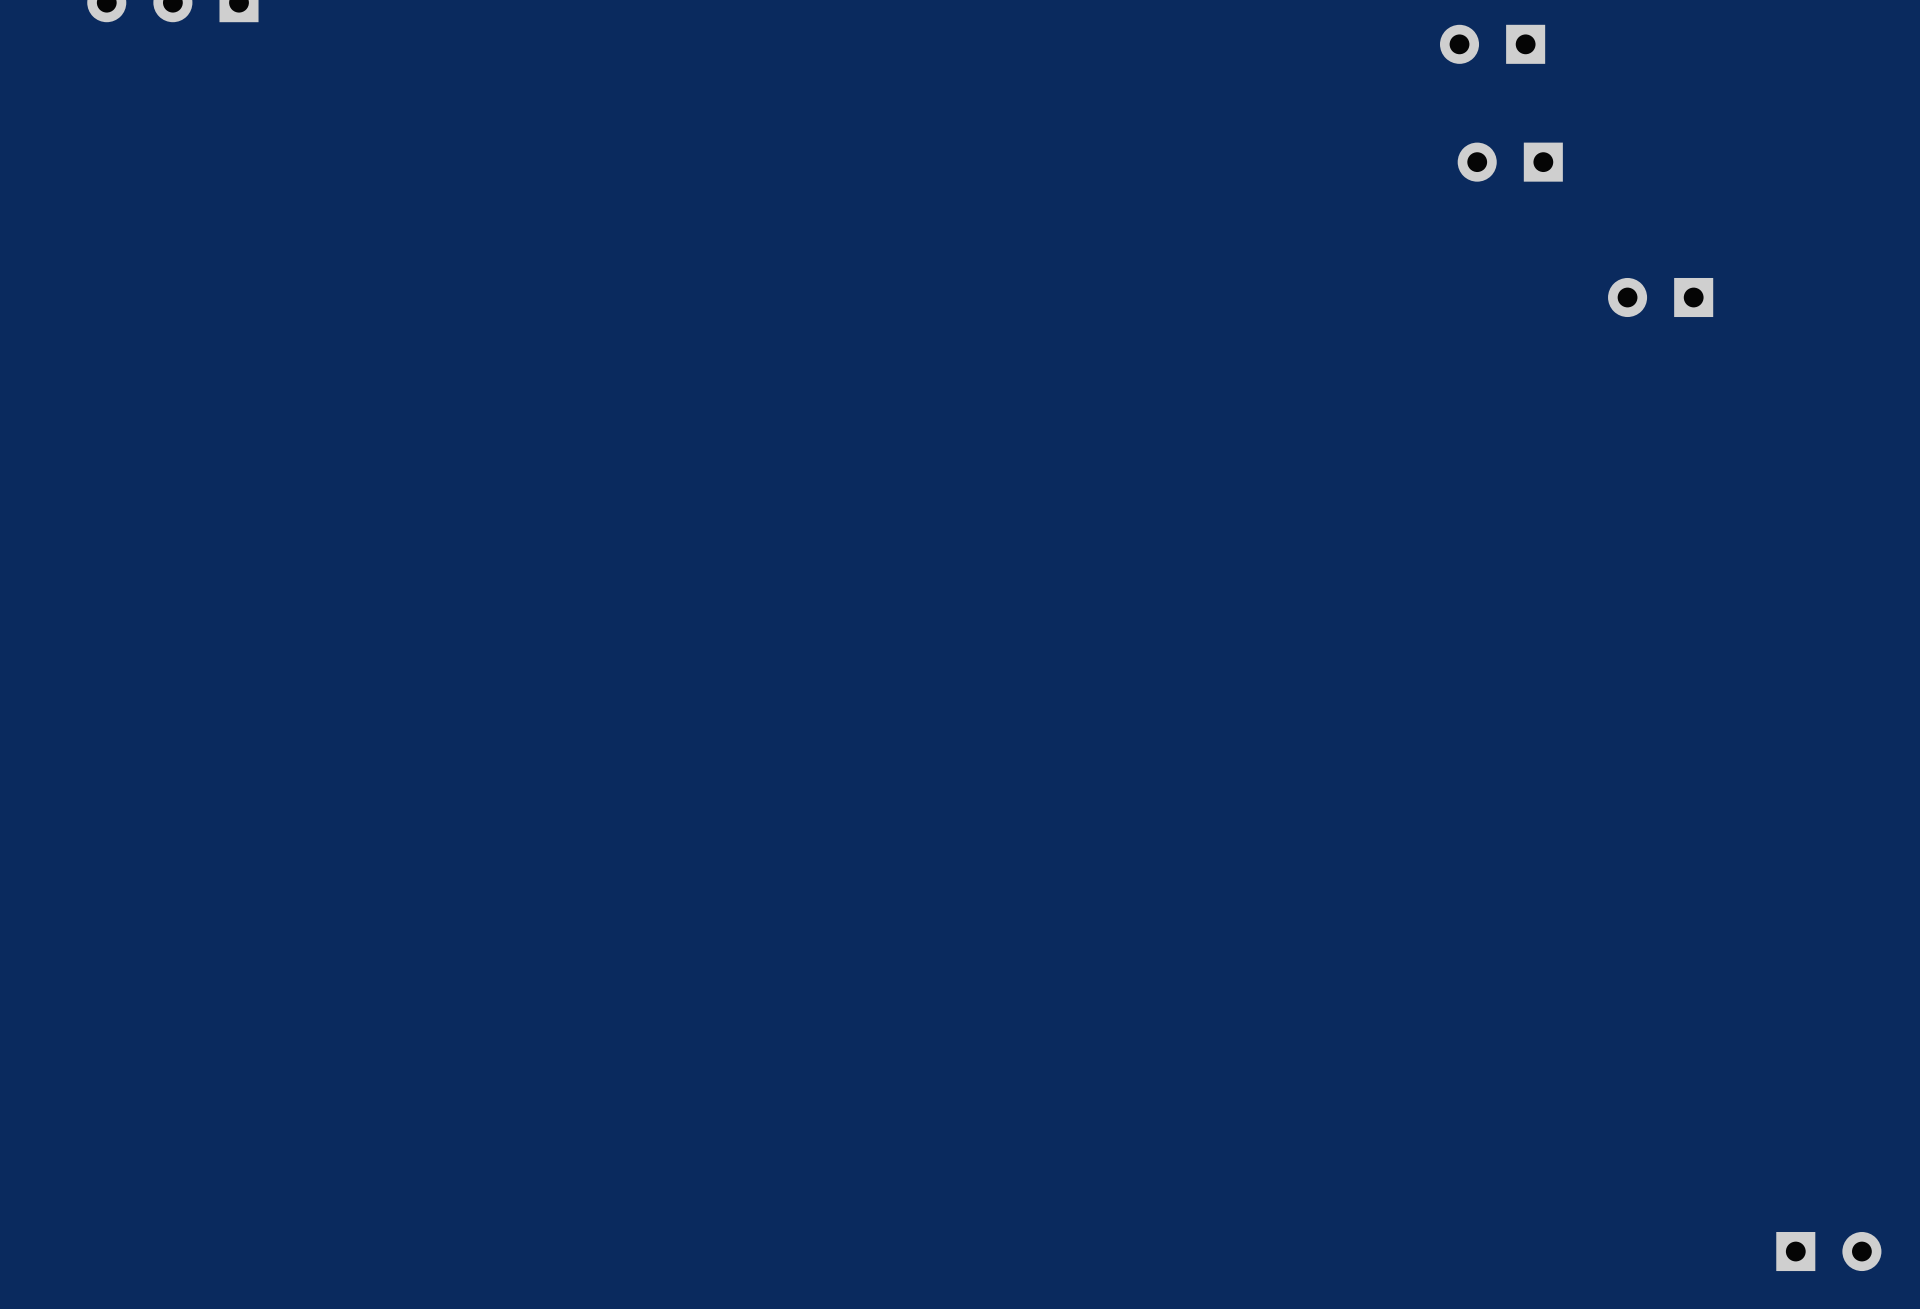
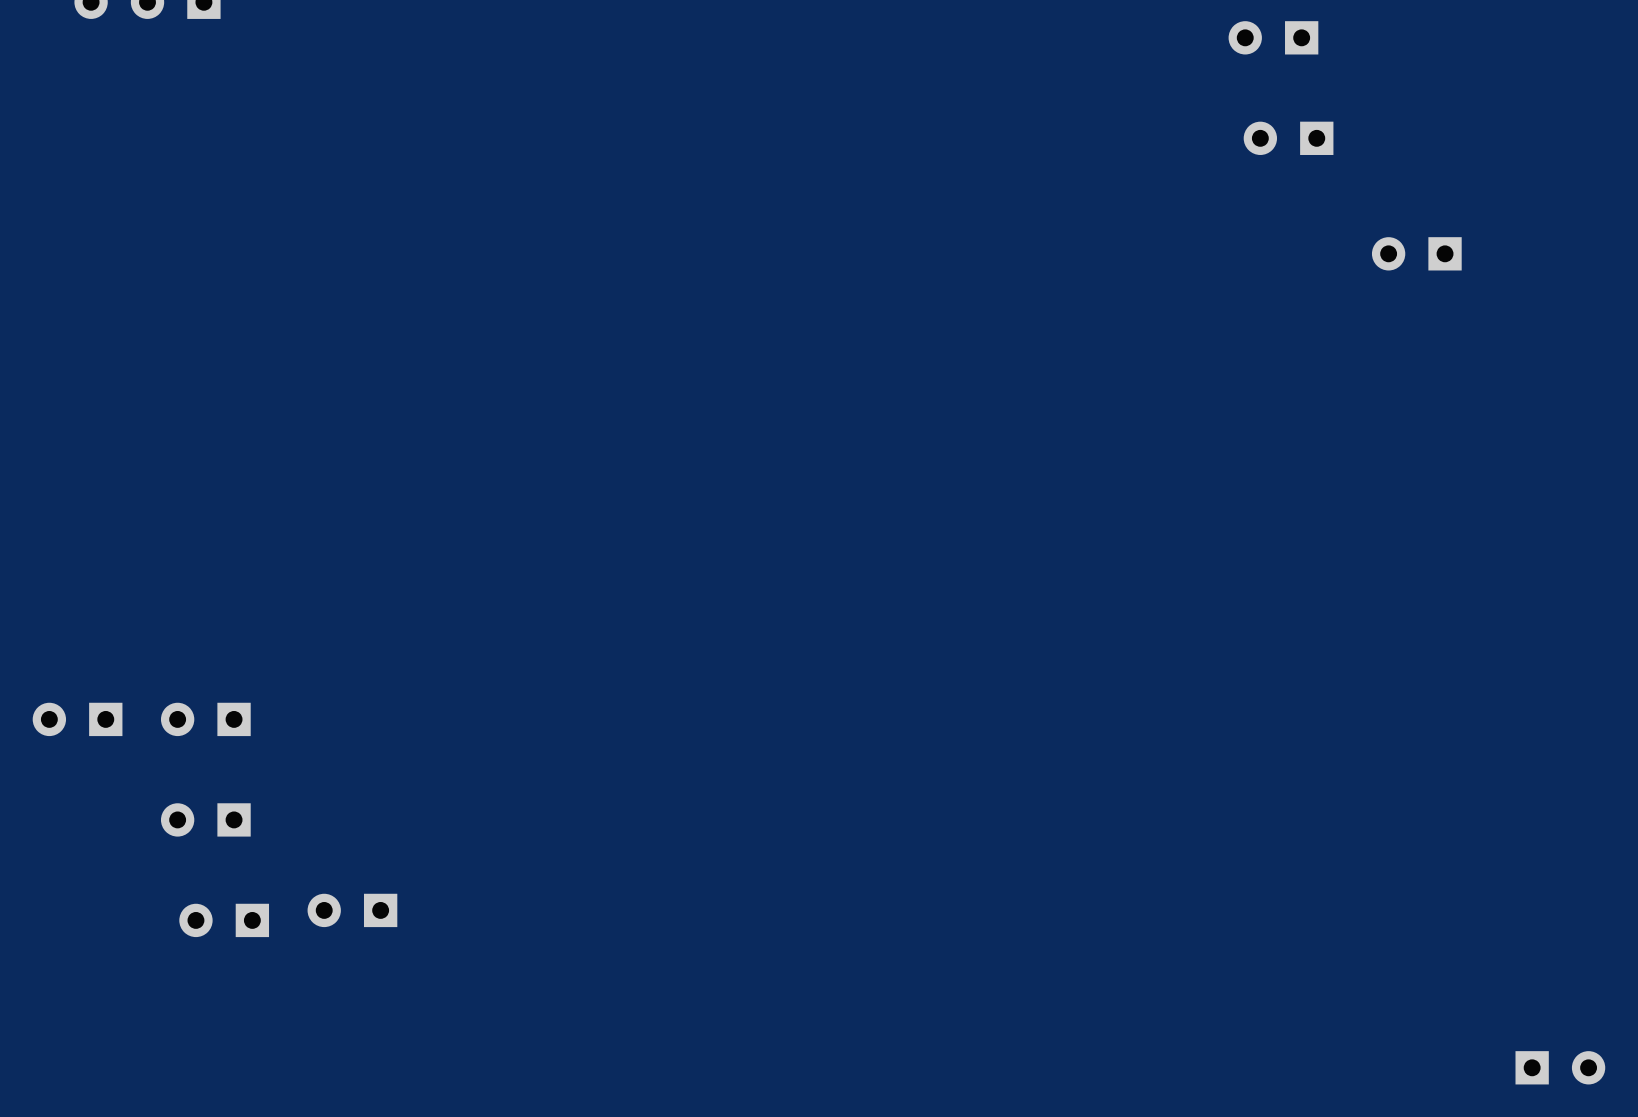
part: none -> (77, 719)
part: none -> (205, 719)
part: none -> (205, 819)
part: none -> (352, 910)
part: none -> (224, 920)

